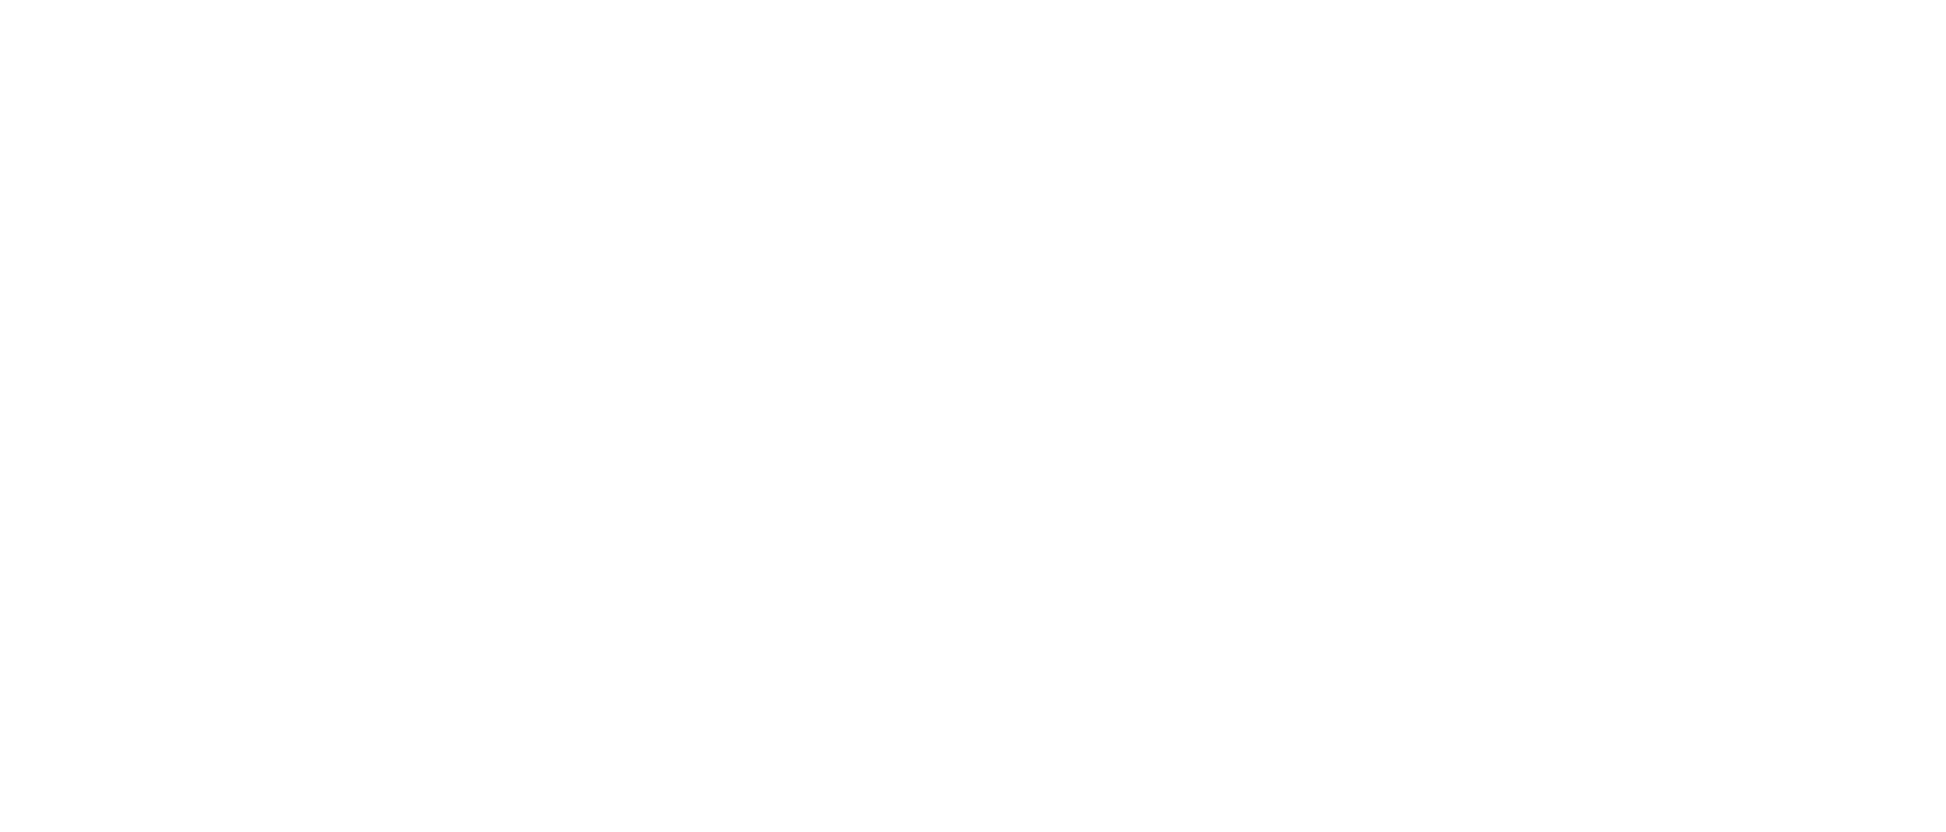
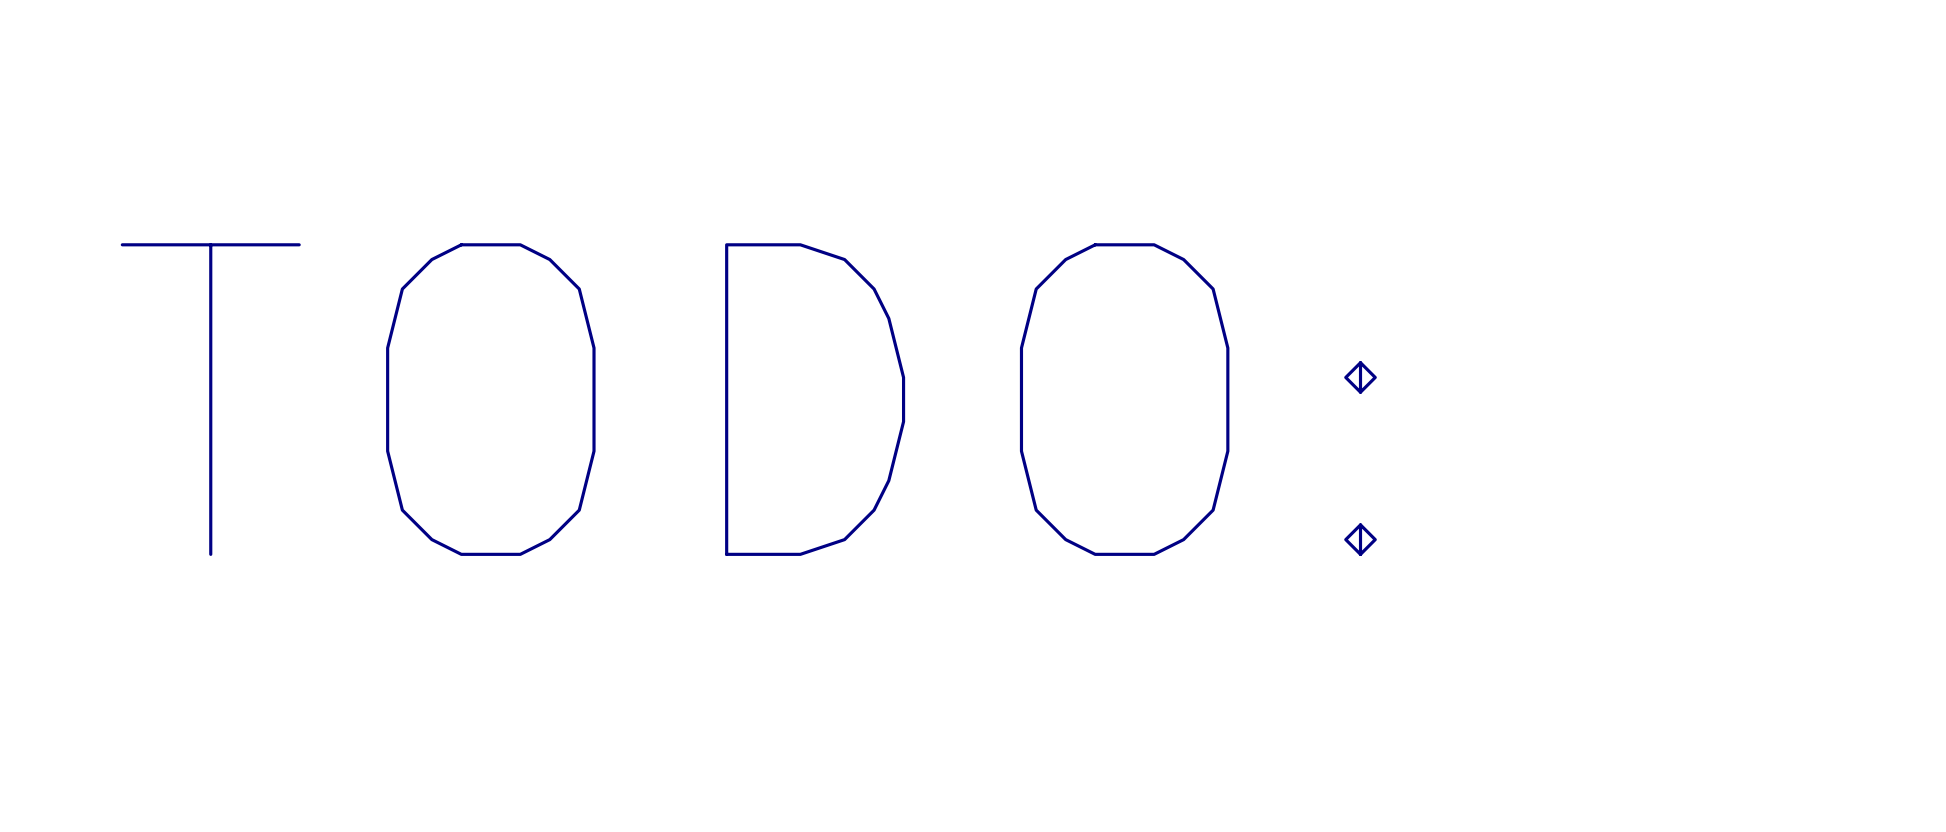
text: none -> TODO: (748, 399)

